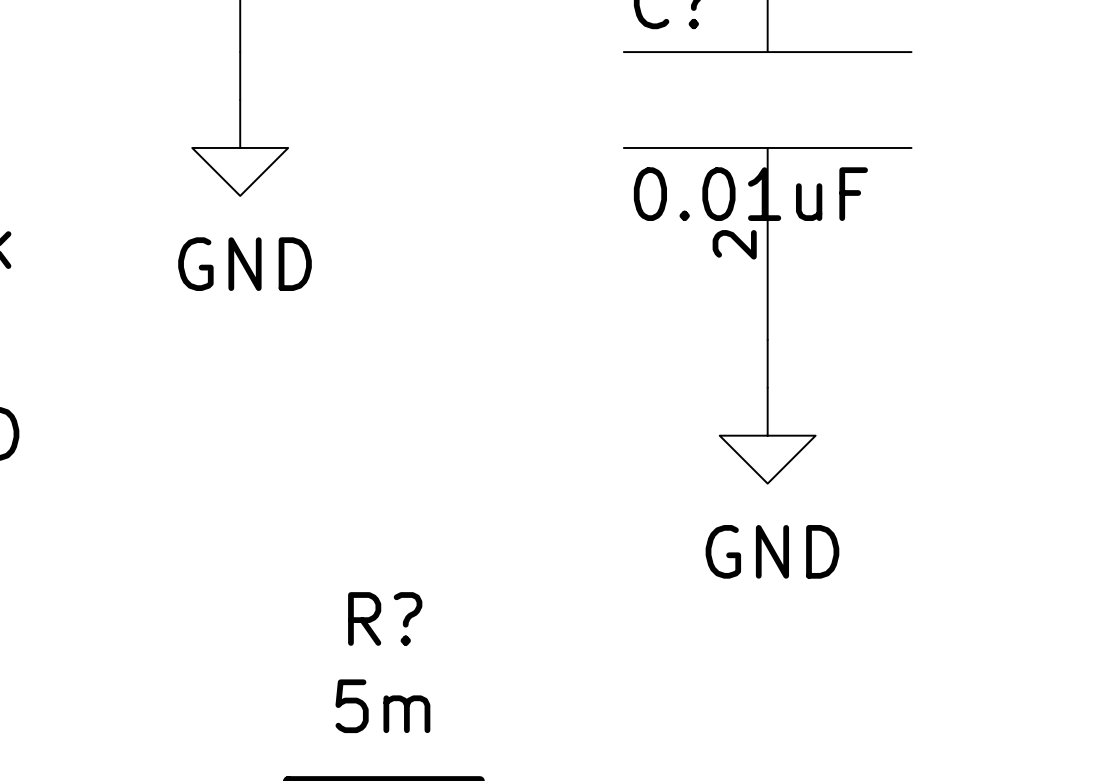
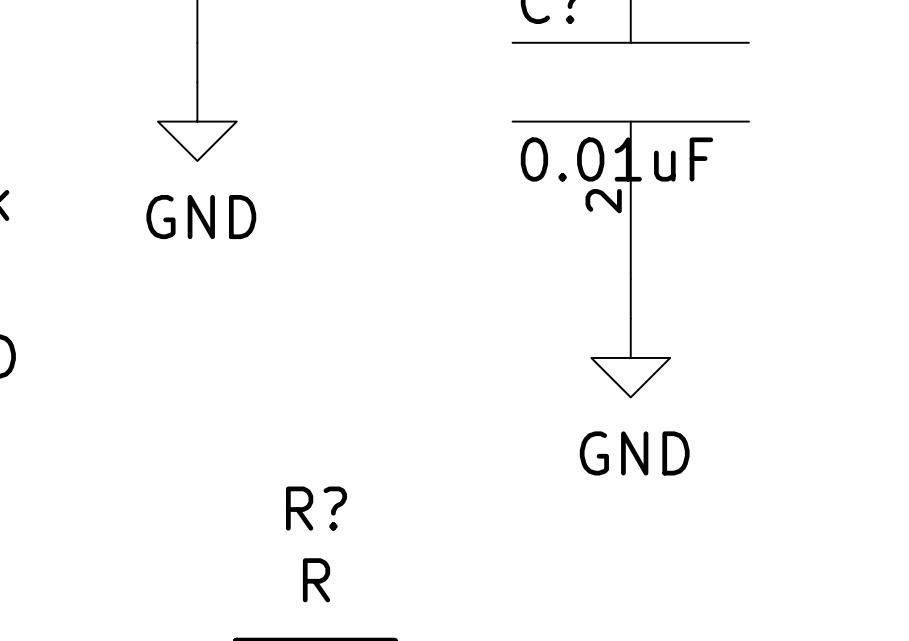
R? value: 5m (382, 706) -> R (316, 580)

